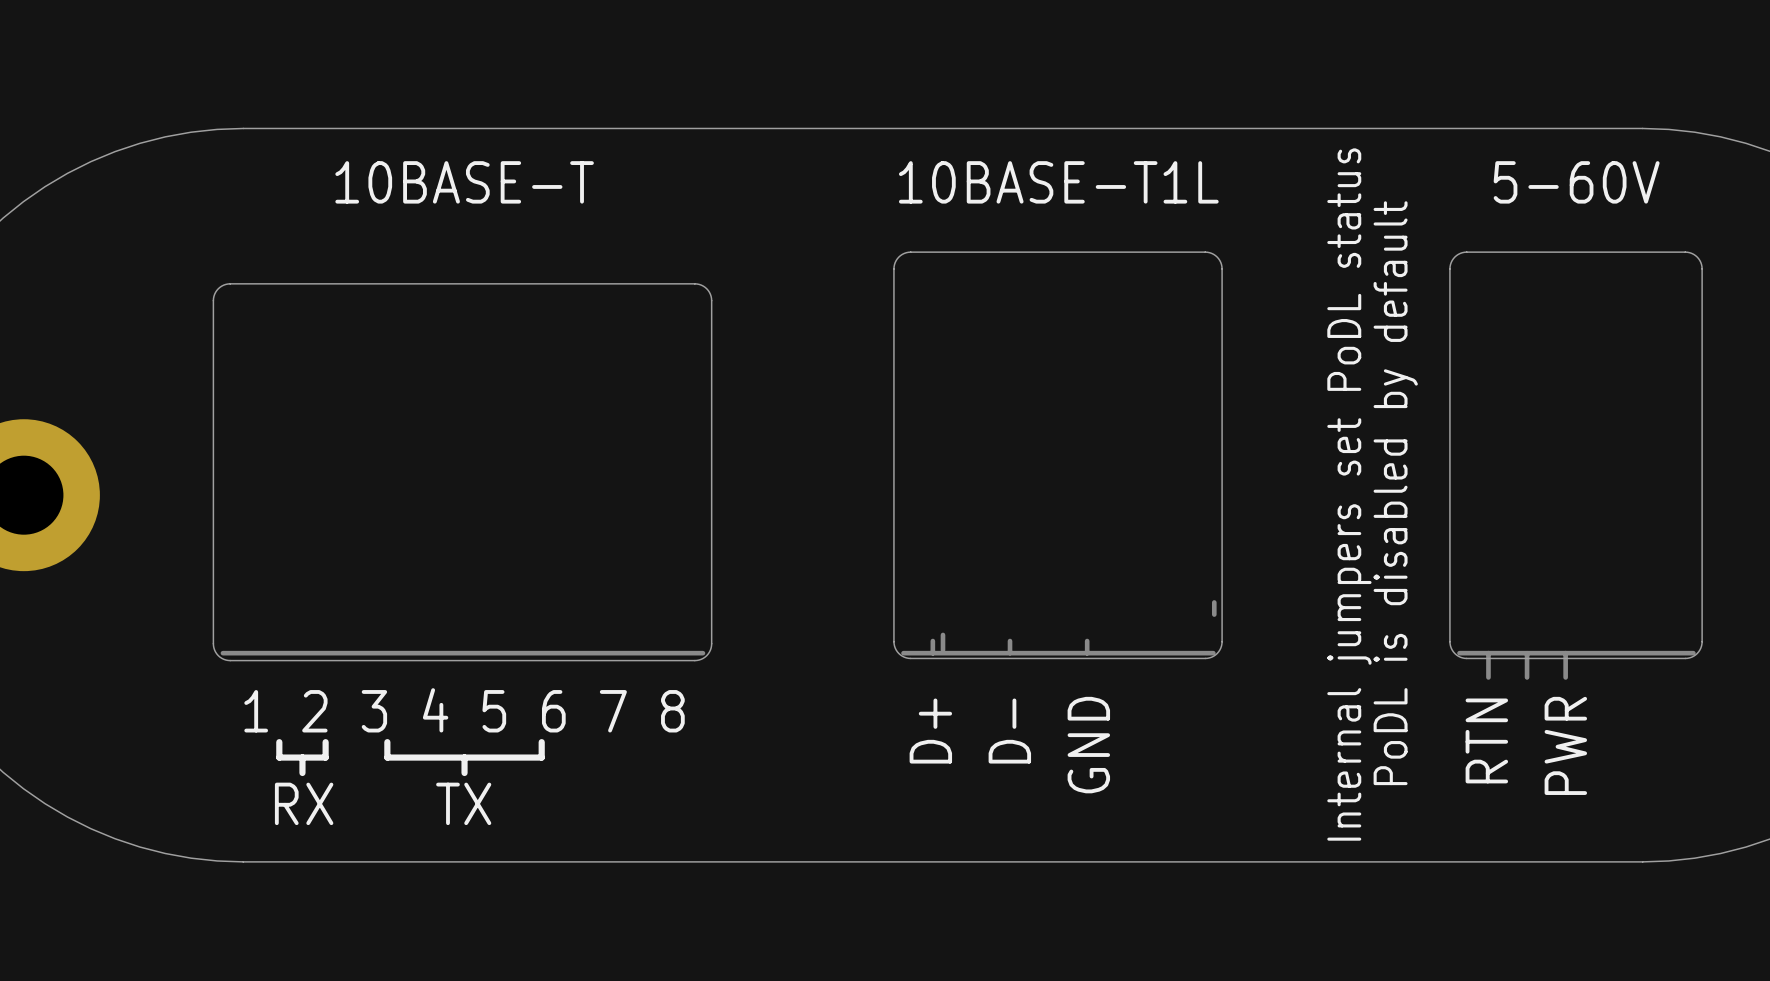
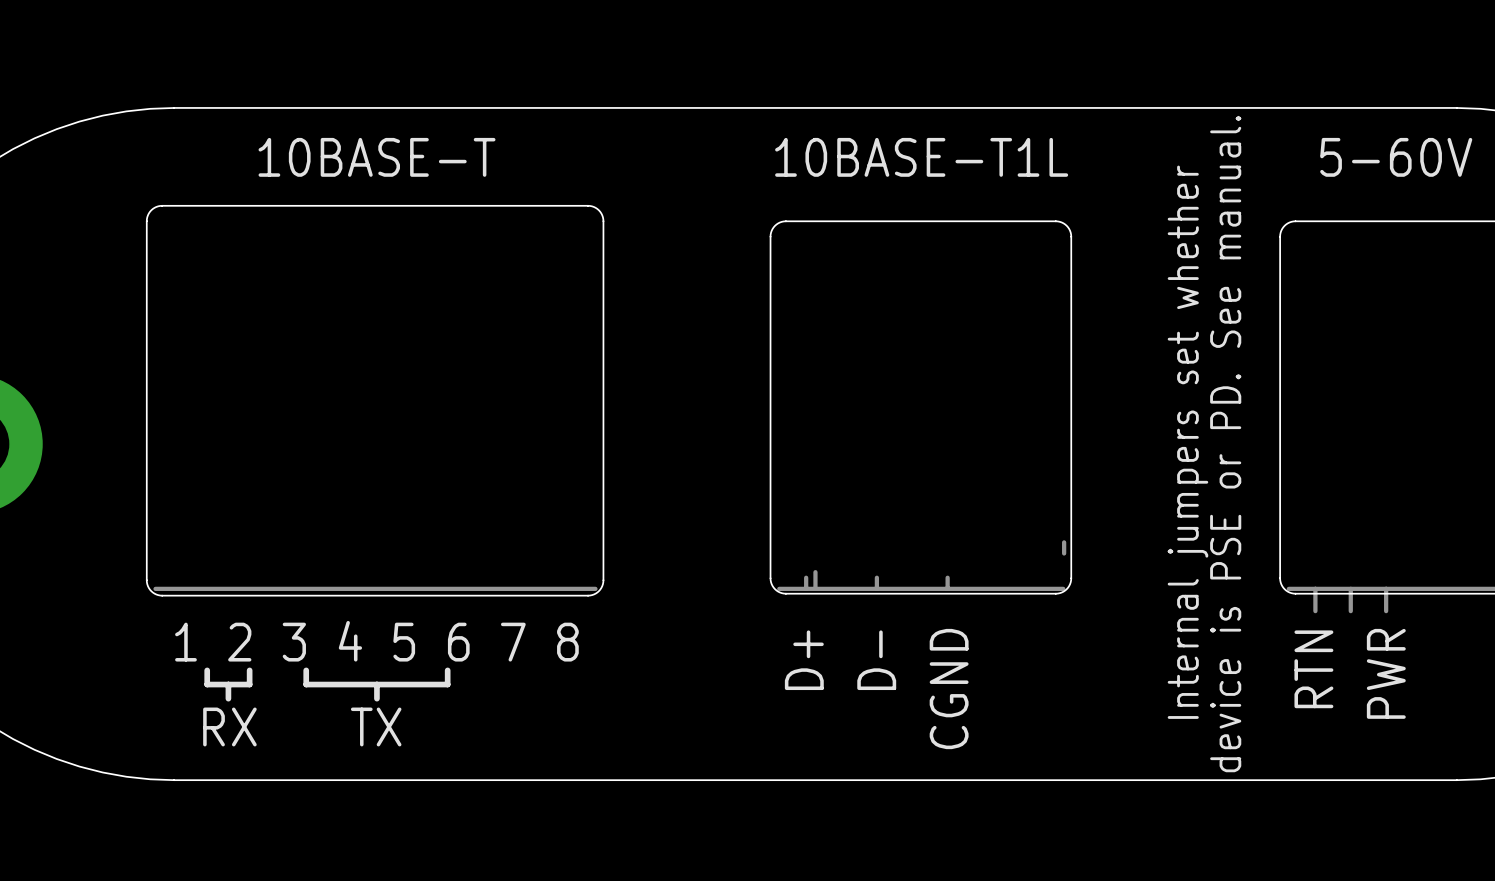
board edge: (213, 300) (218, 288) (230, 283) (694, 283) (706, 288) (711, 300) -> (146, 265) (147, 217) (152, 208) (162, 205) (590, 205) (598, 210) (602, 217) (603, 265)
text: PoDL is disabled by default (1395, 493) -> device is PSE or PD. See manual. (1225, 444)
text: Internal jumpers set PoDL status (1349, 494) -> Internal jumpers set whether (1187, 442)
text: GND (1088, 745) -> CGND (949, 689)

